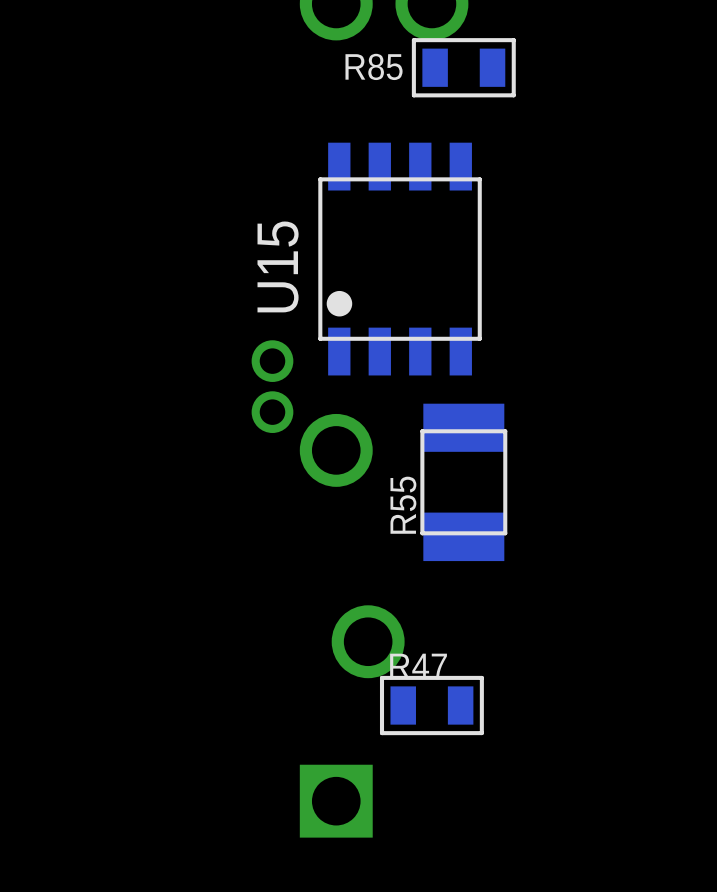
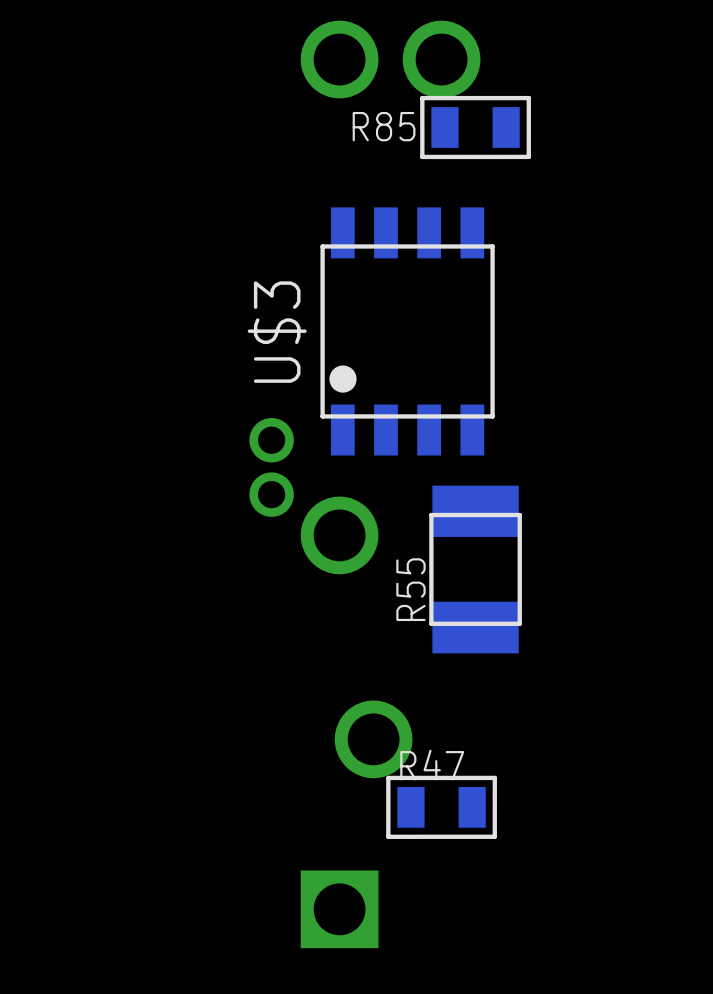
U15 name: U15 (278, 266) -> U$3 (277, 332)

